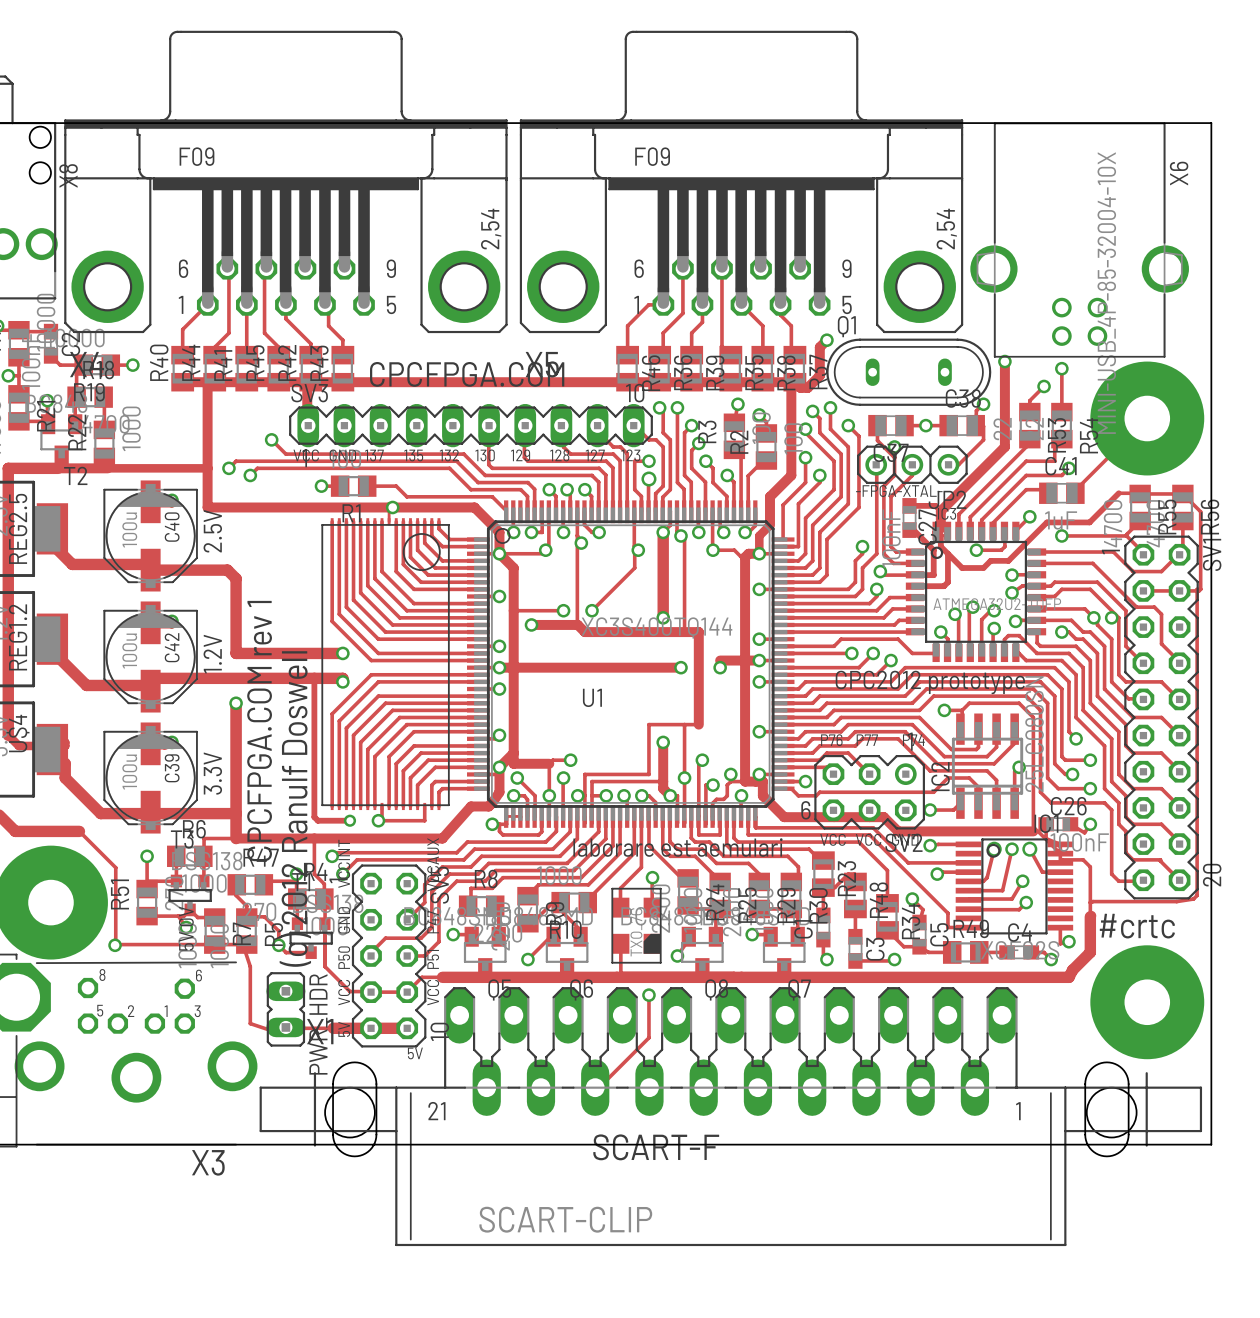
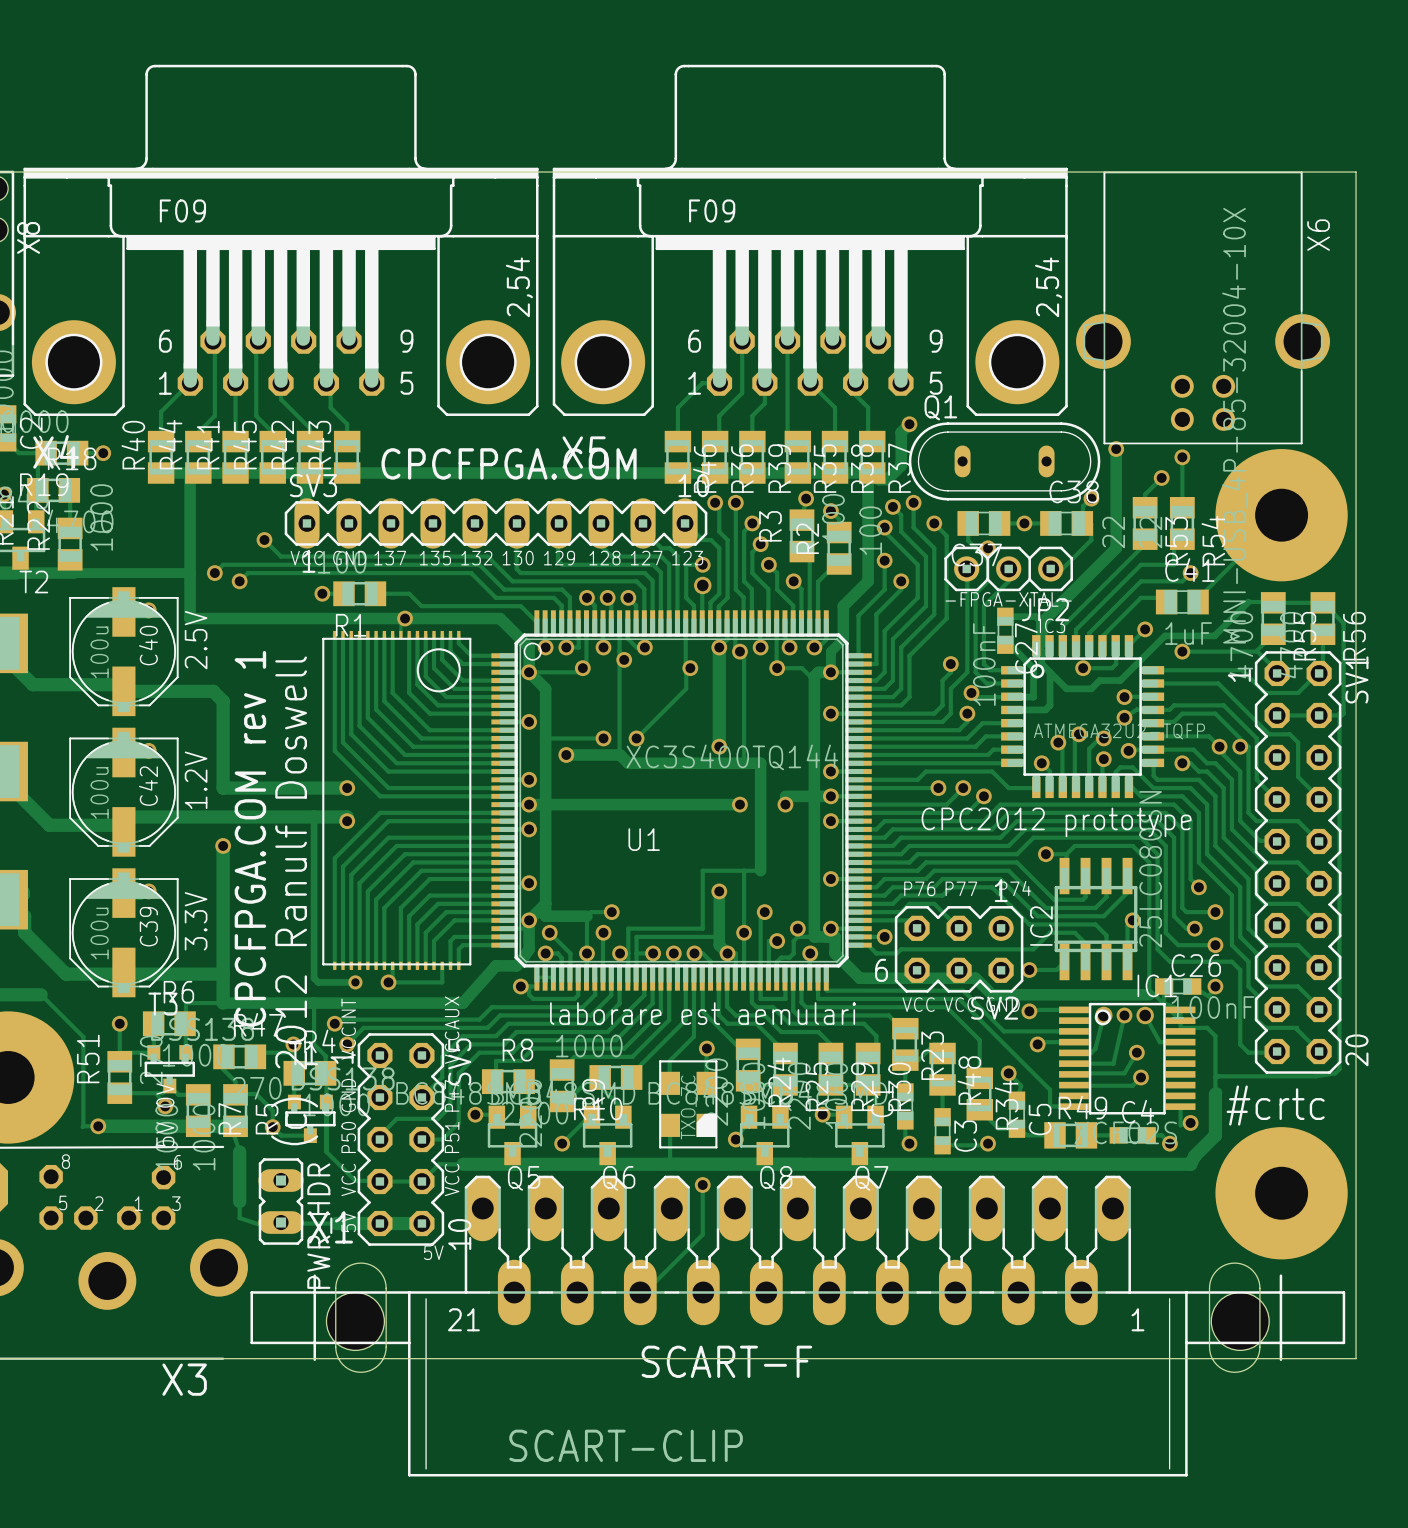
track width: thin (128, 944) (246, 944) -> thick (98, 1126) (235, 1126)
via position: (115, 945) -> (98, 1126)
track width: thin (250, 966) (250, 1009) -> thick (239, 1151) (239, 1201)

